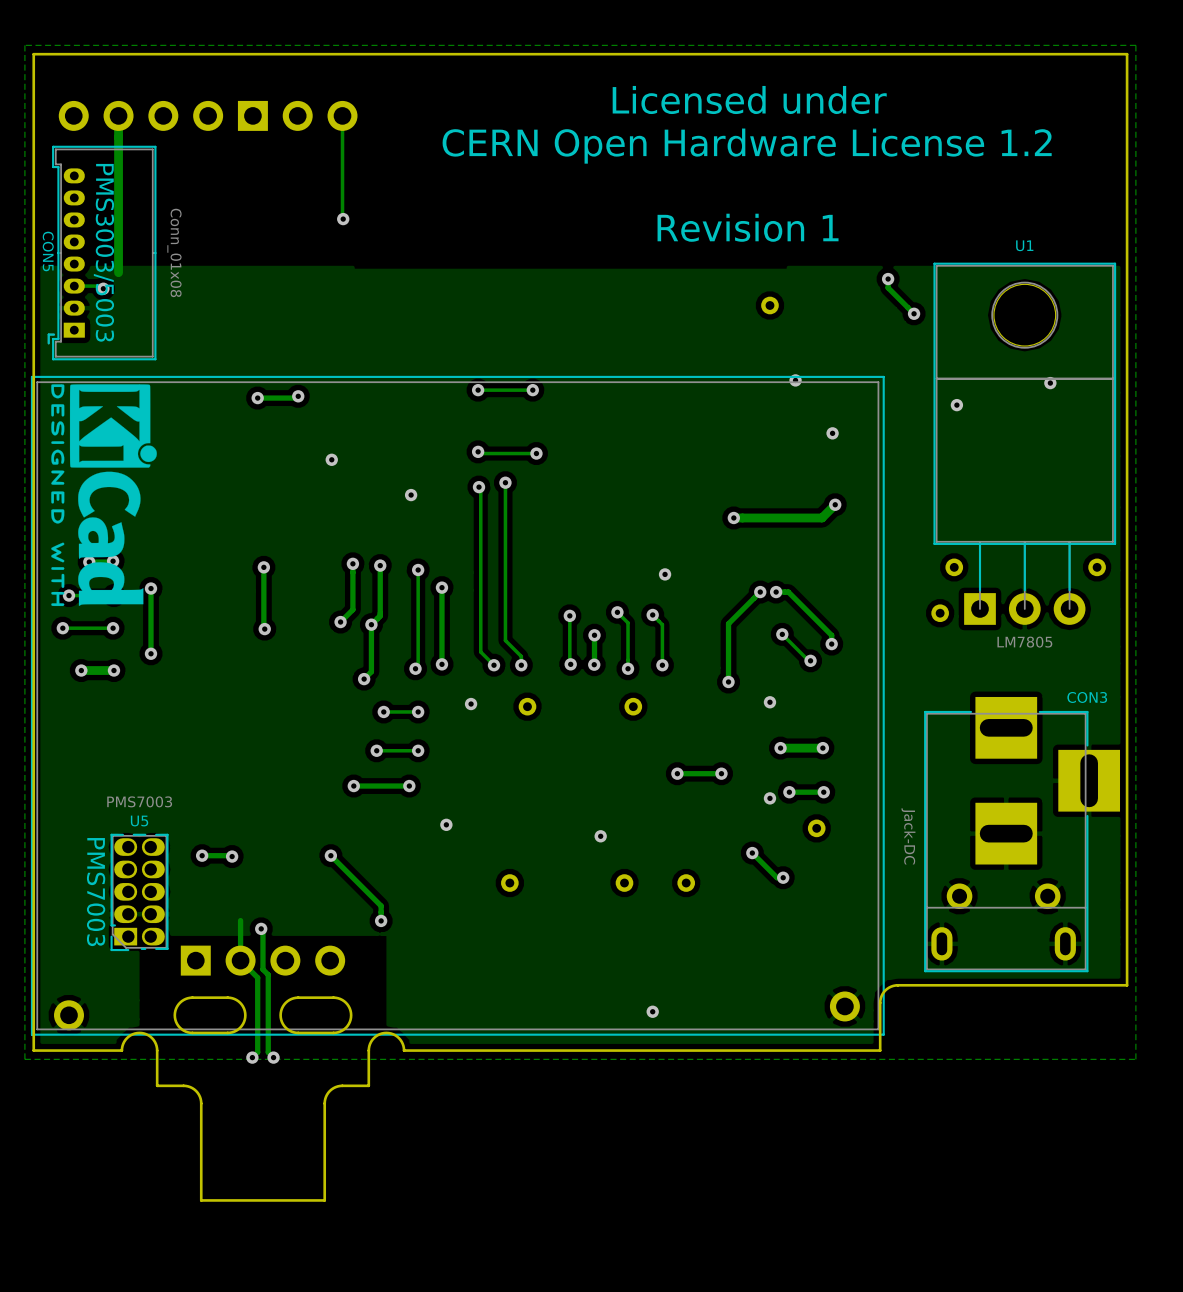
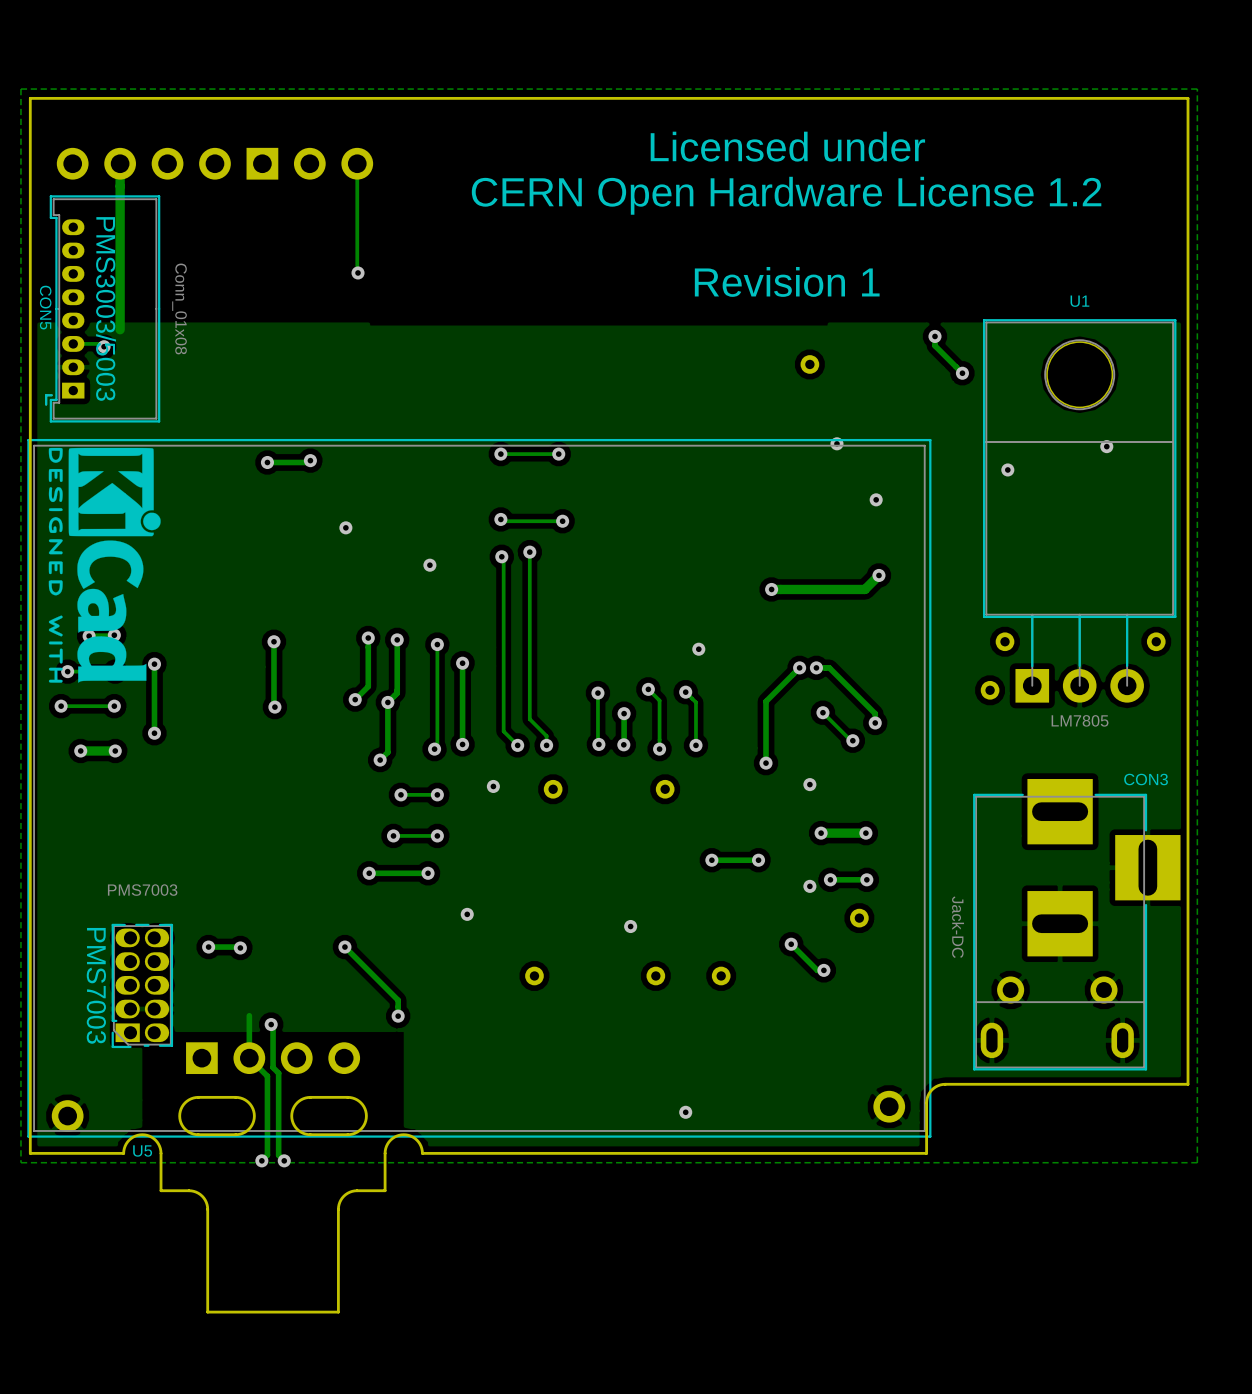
U5 name position: U5 (139, 821) -> U5 (142, 1150)

